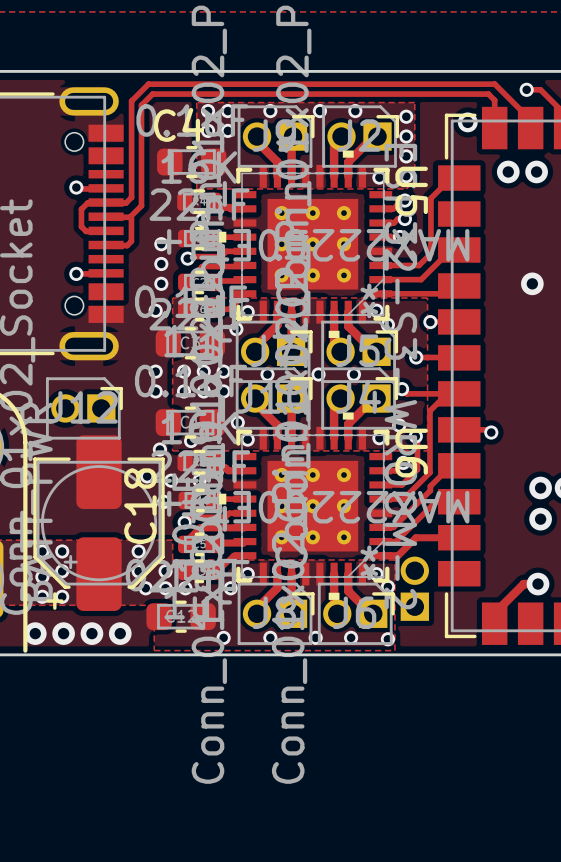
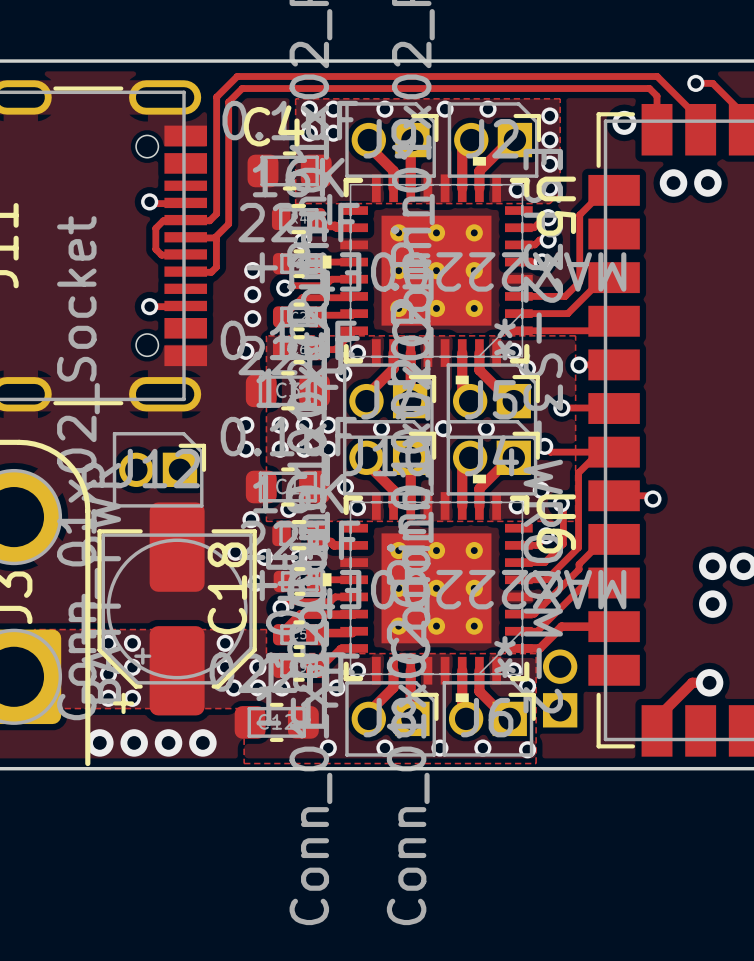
via: (532, 283) -> none

